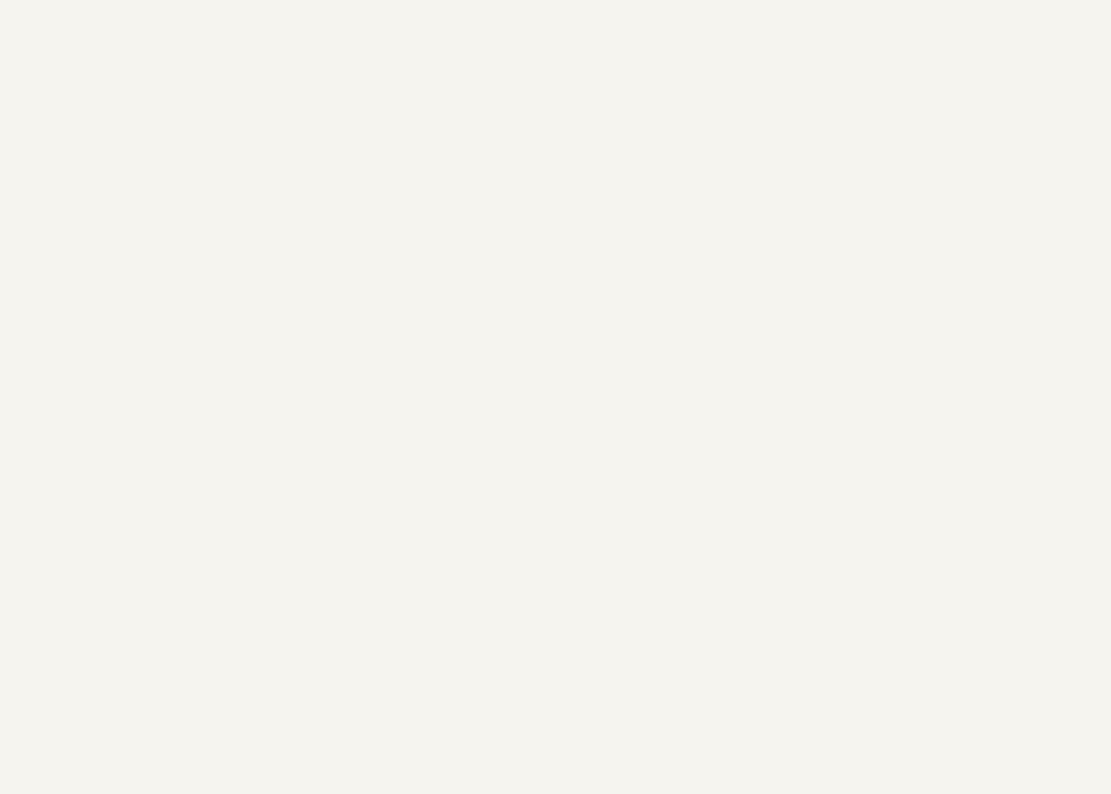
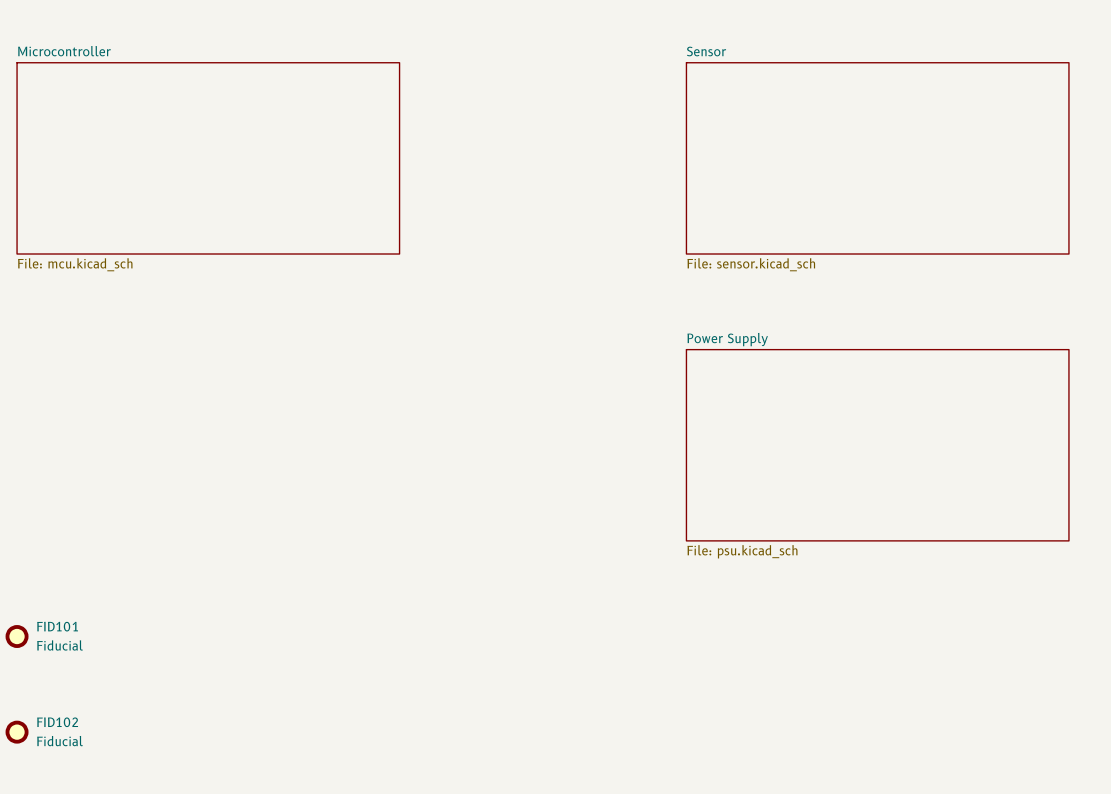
sheet Microcontroller: none -> File: mcu.kicad_sch (208, 158)
sheet Sensor: none -> File: sensor.kicad_sch (877, 158)
sheet Power Supply: none -> File: psu.kicad_sch (877, 445)
FID101: none -> Fiducial (17, 636)
FID102: none -> Fiducial (17, 732)

